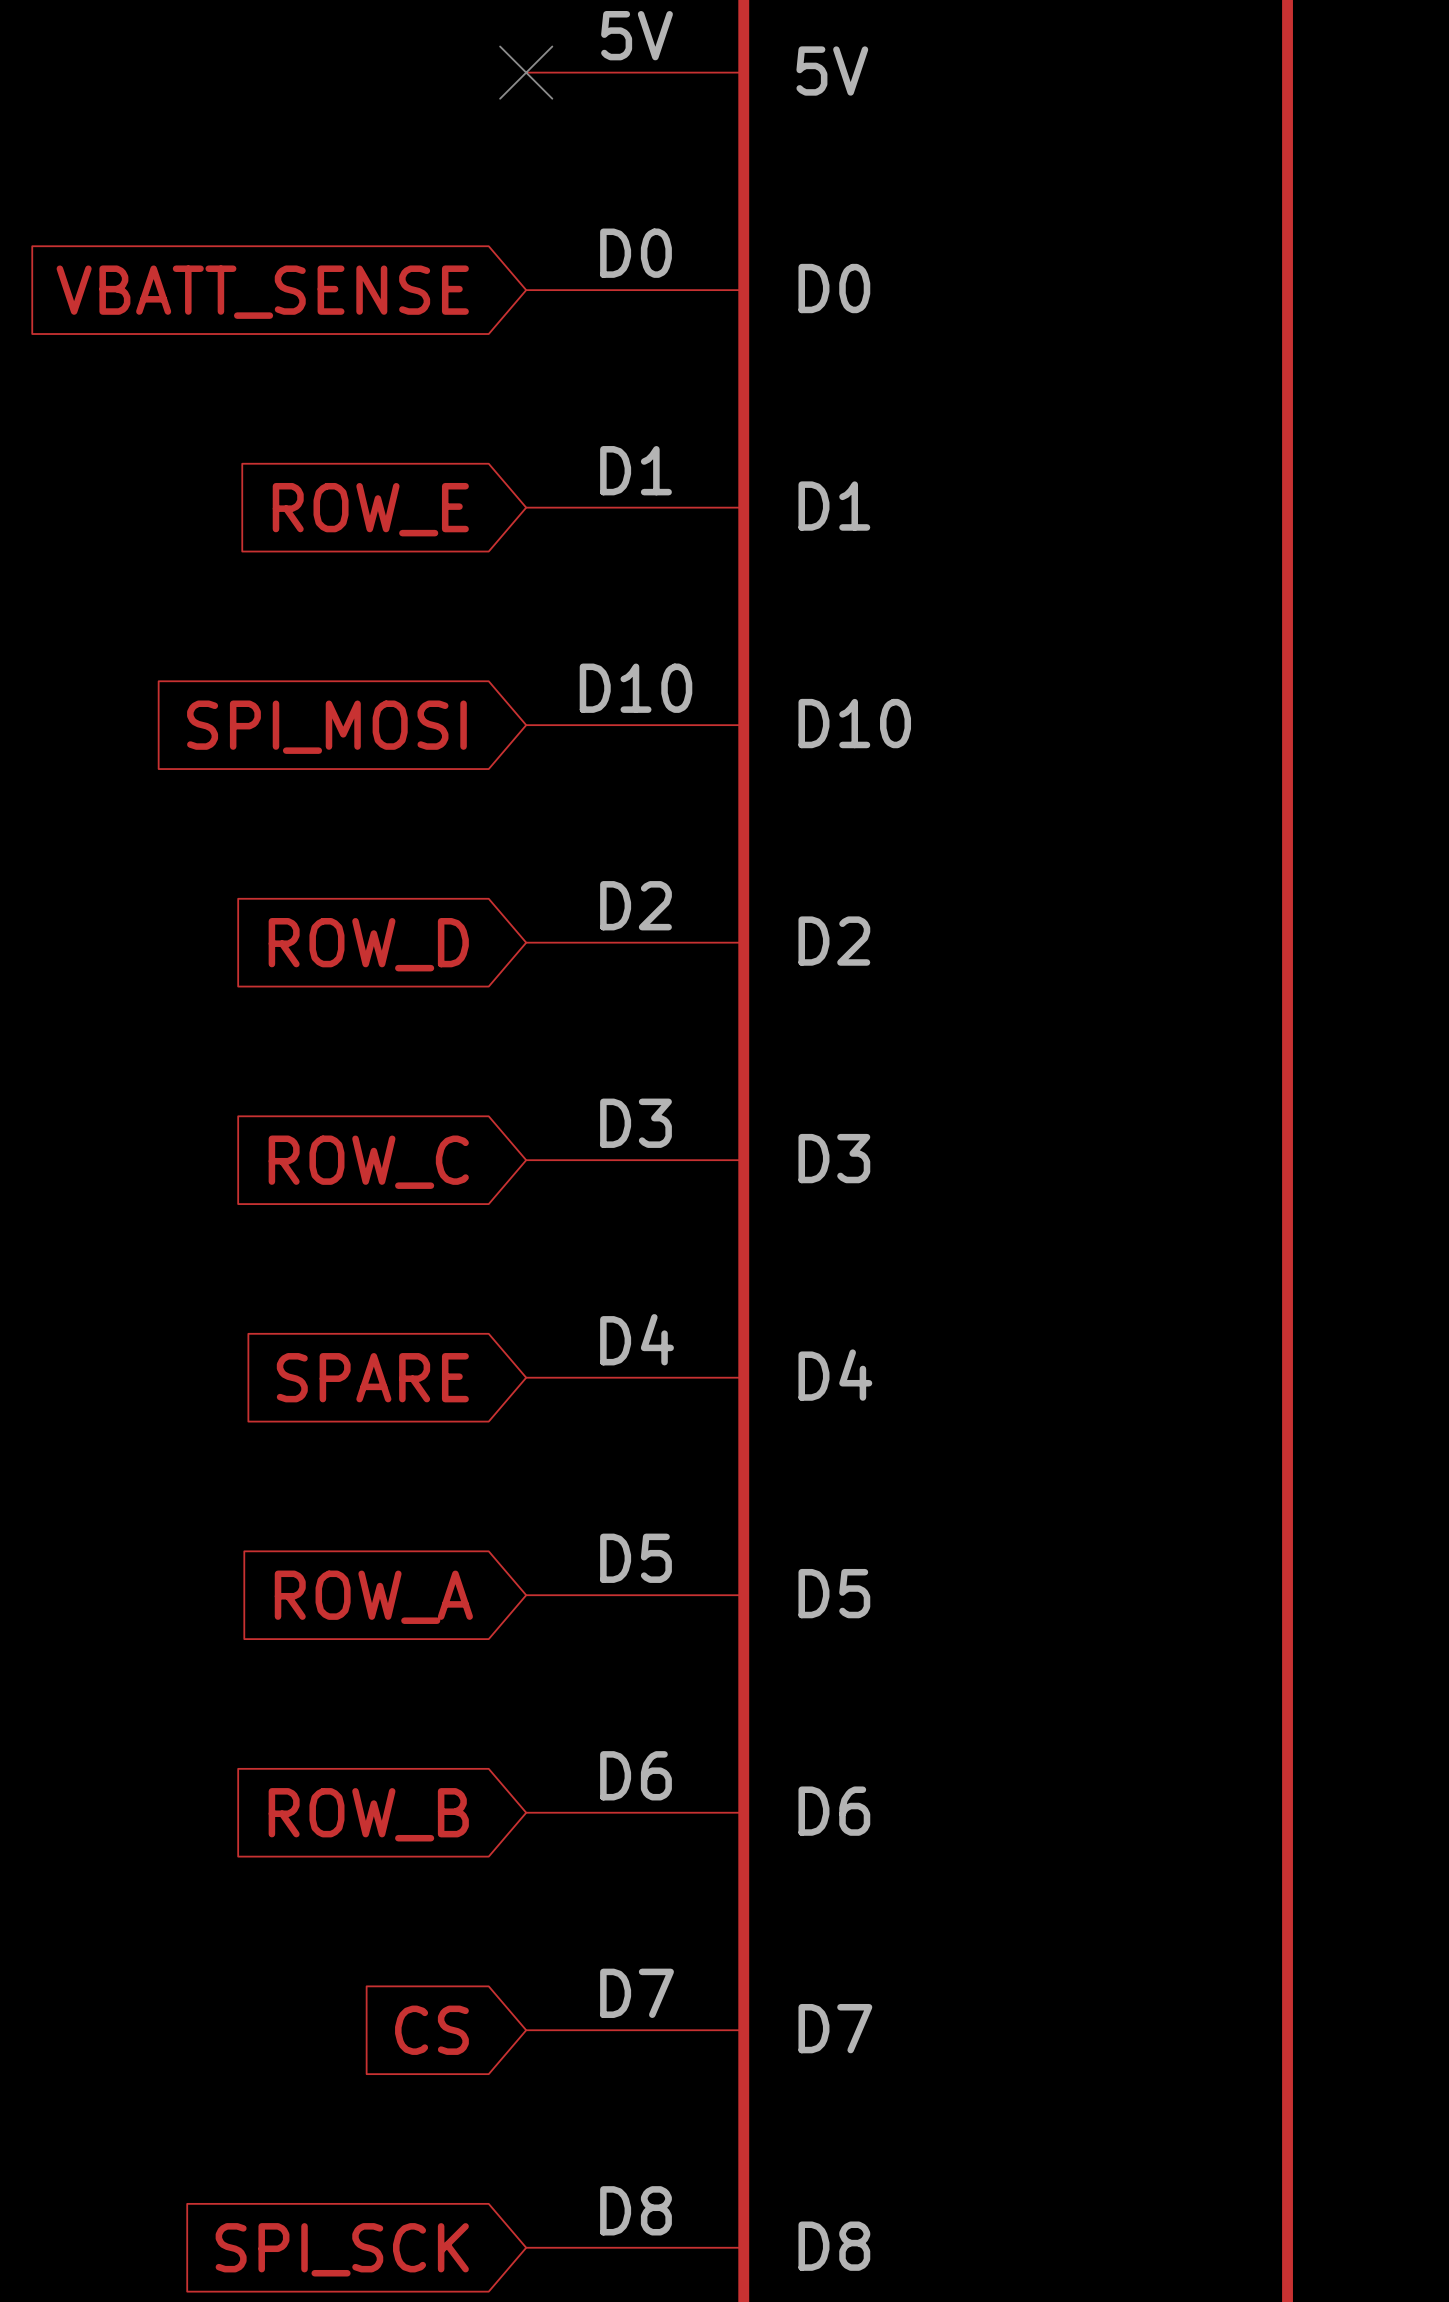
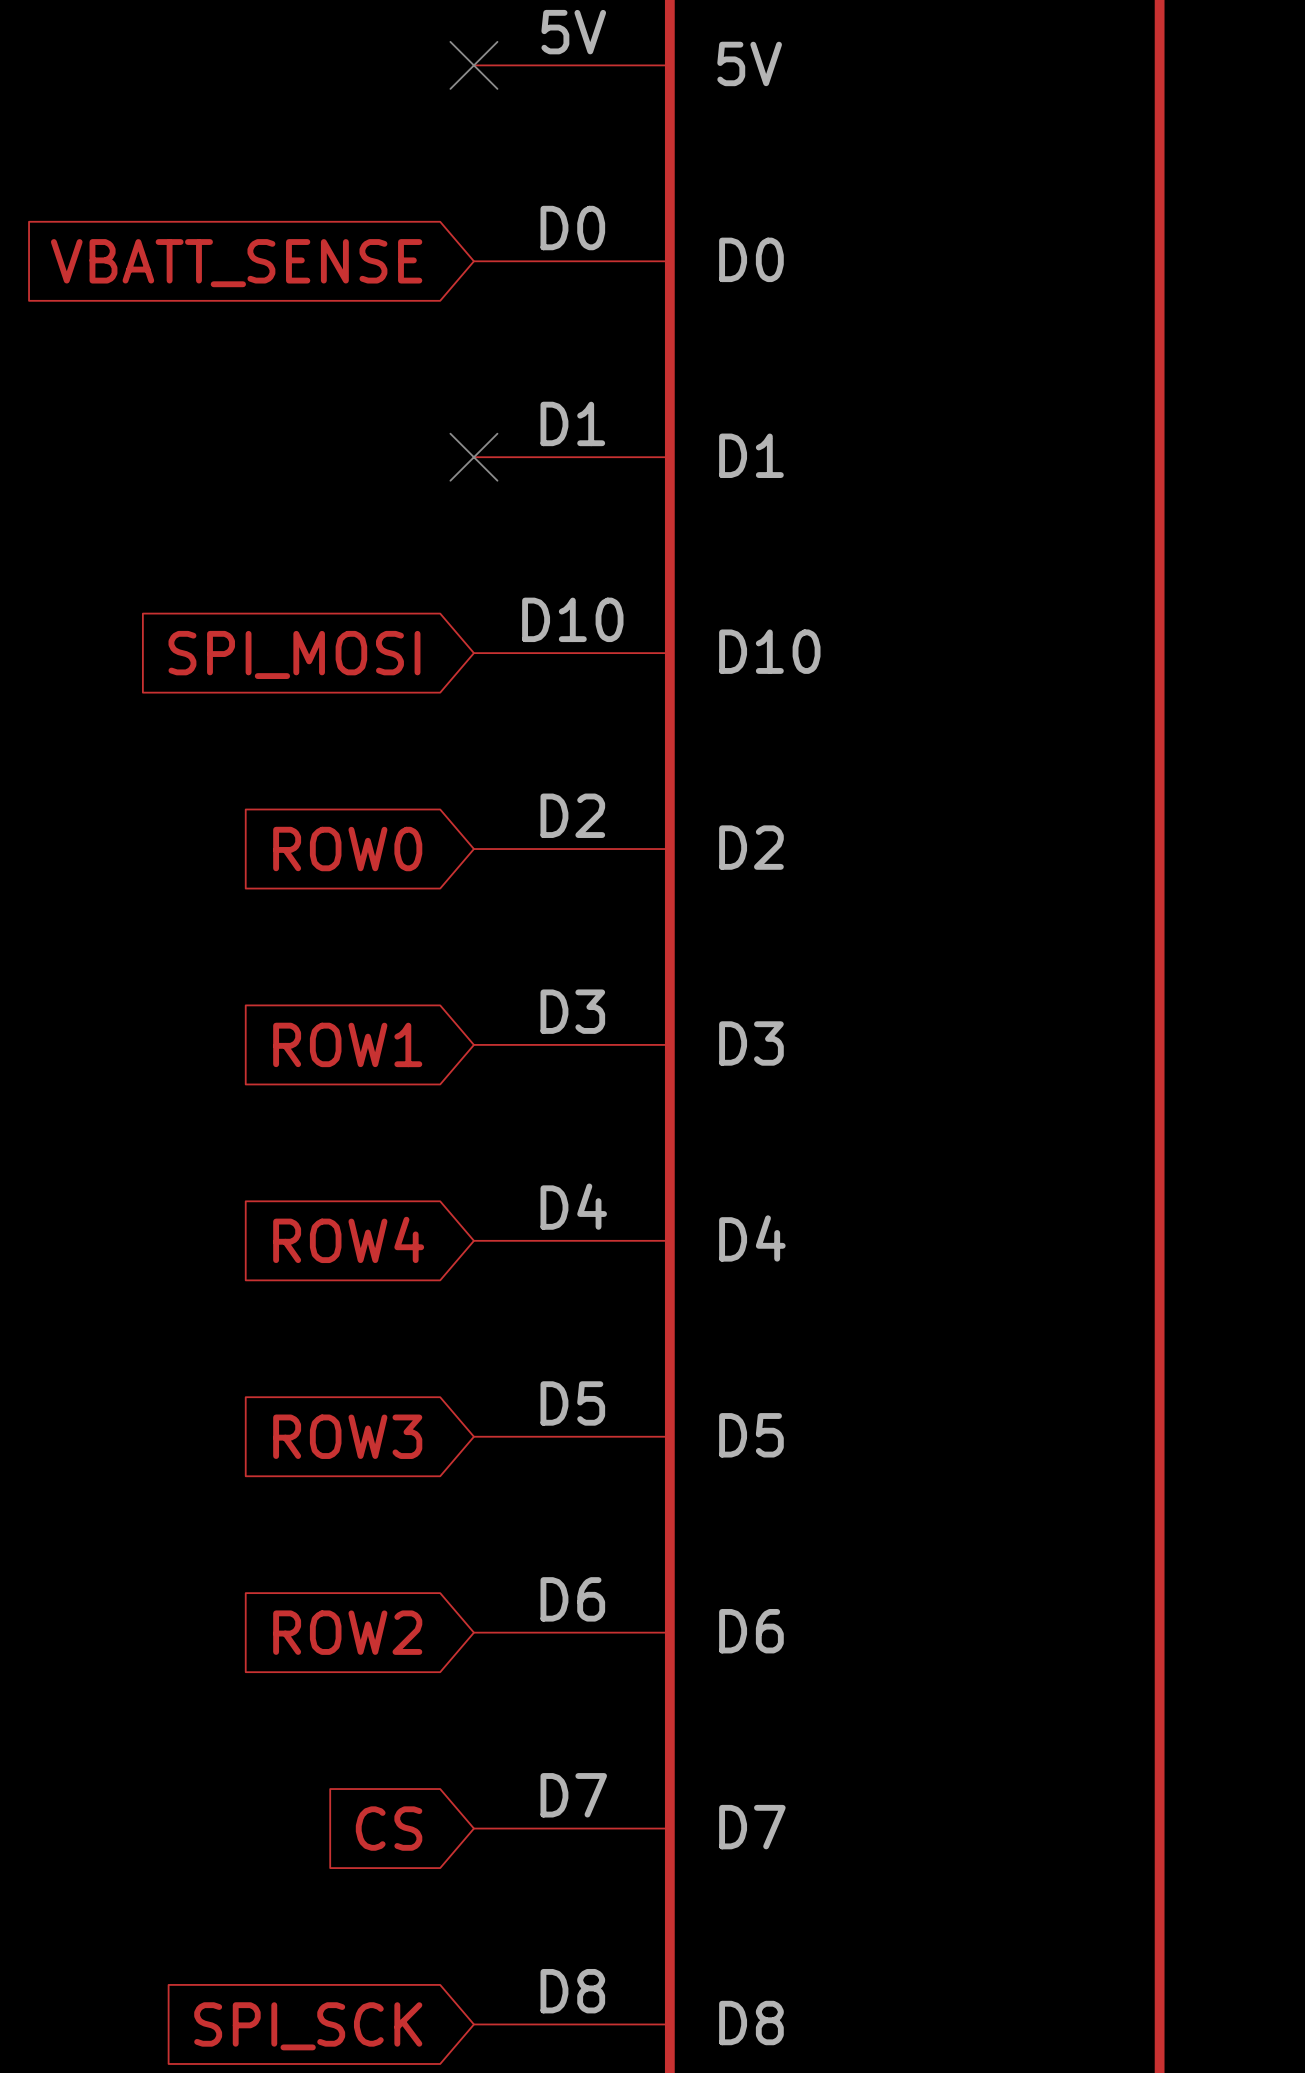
no-connect mark: none -> (473, 457)
global label: ROW_E (370, 509) -> none
global label: ROW_D (368, 944) -> ROW0 (347, 849)
global label: ROW_C (368, 1162) -> ROW1 (347, 1044)
global label: SPARE (372, 1377) -> ROW4 (348, 1239)
global label: ROW_A (373, 1597) -> ROW3 (347, 1436)
global label: ROW_B (368, 1814) -> ROW2 (347, 1632)

